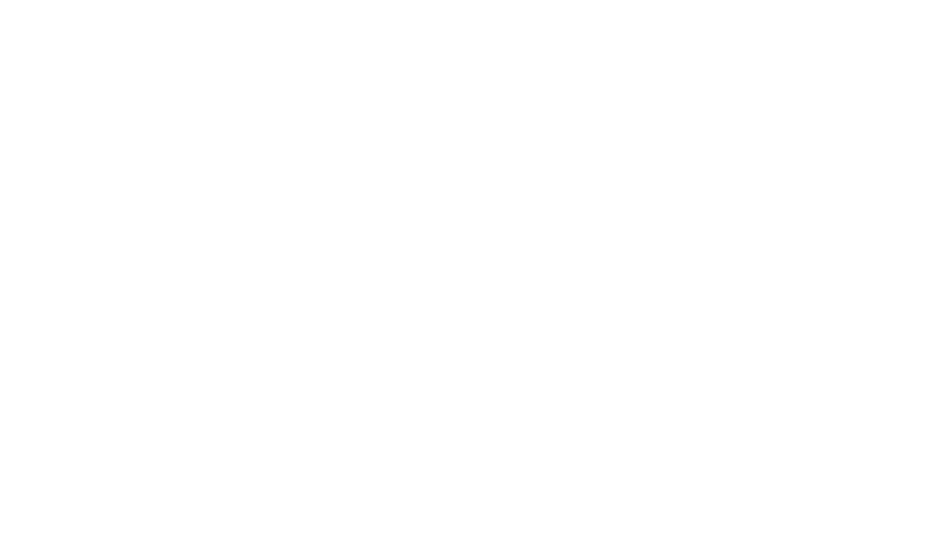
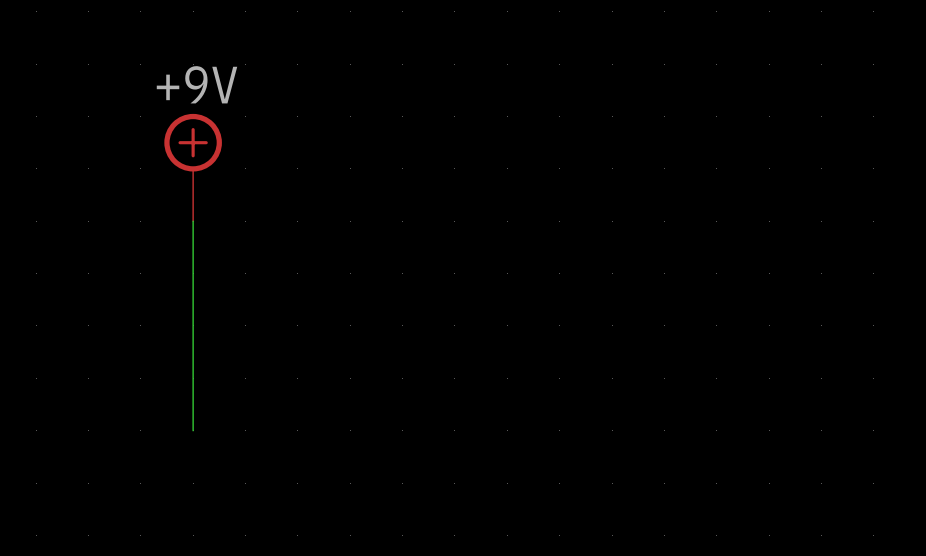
power symbol: none -> +9V (193, 167)
wire: none -> (193, 221) (193, 430)

